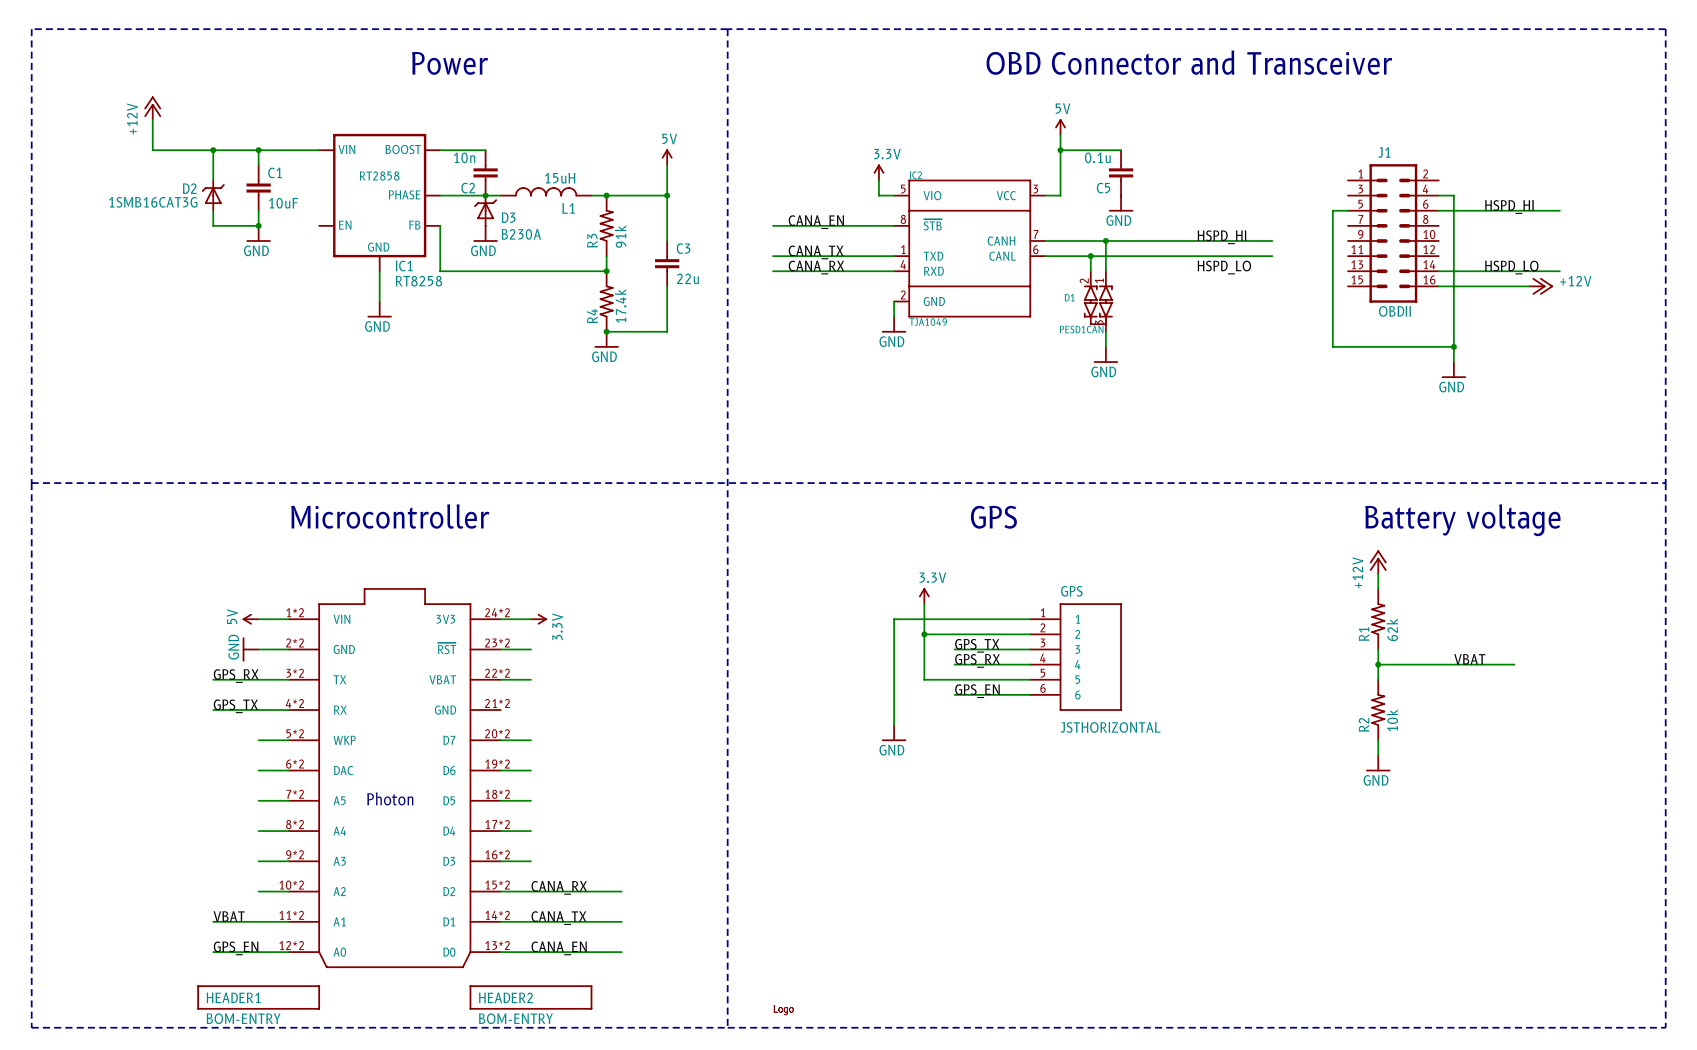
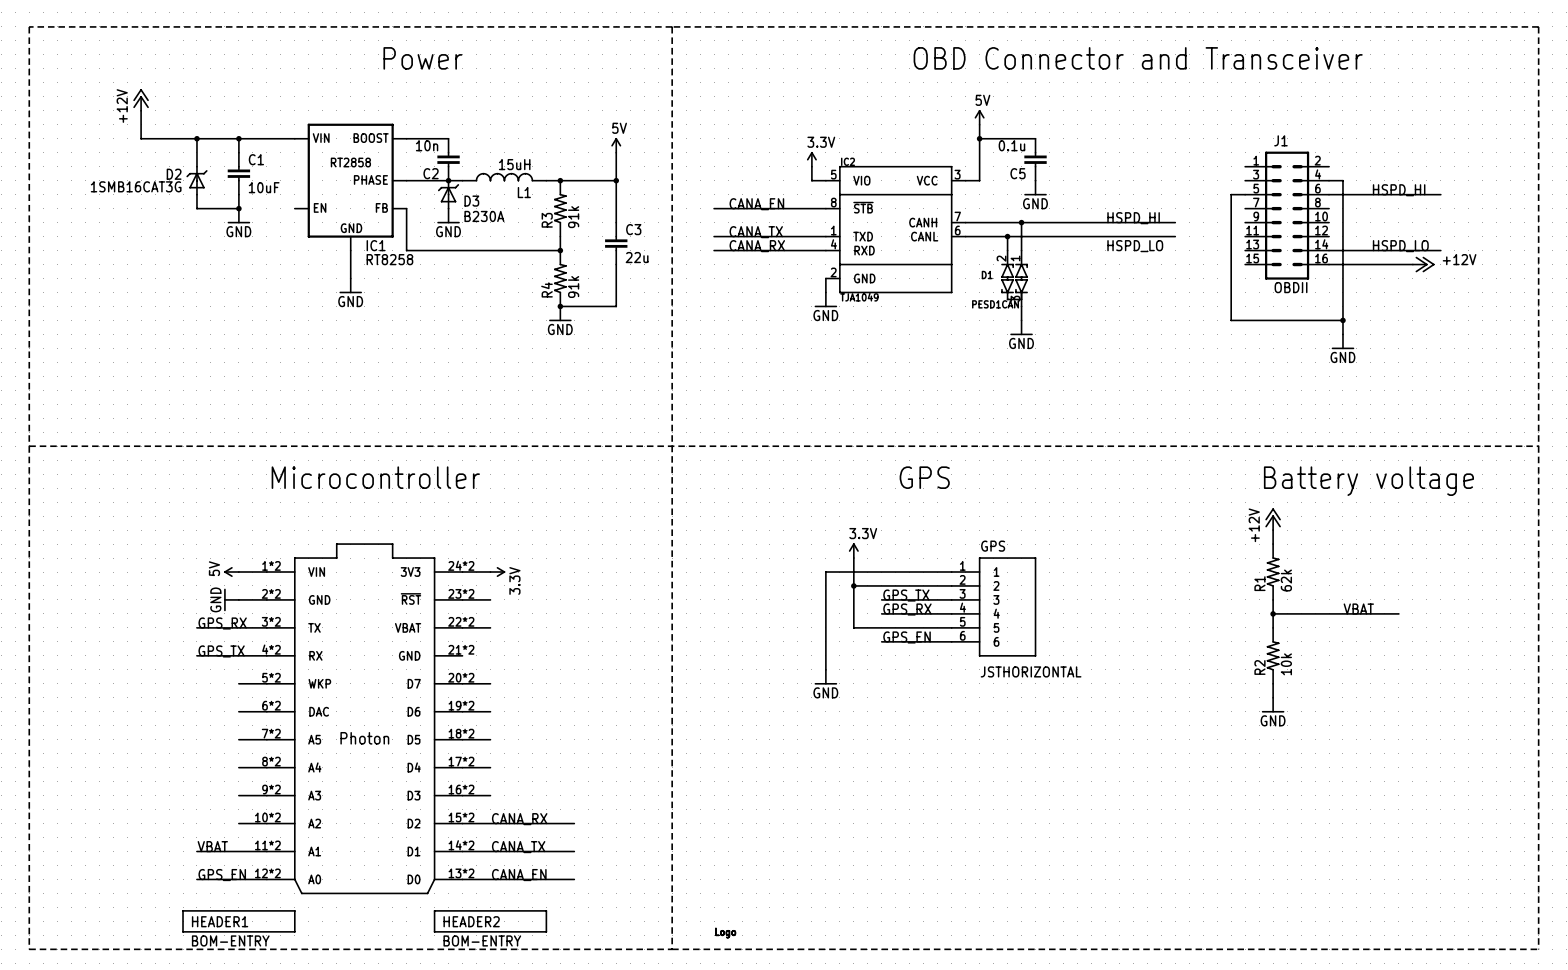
R4 value: 17.4k (620, 306) -> 91k (573, 287)

